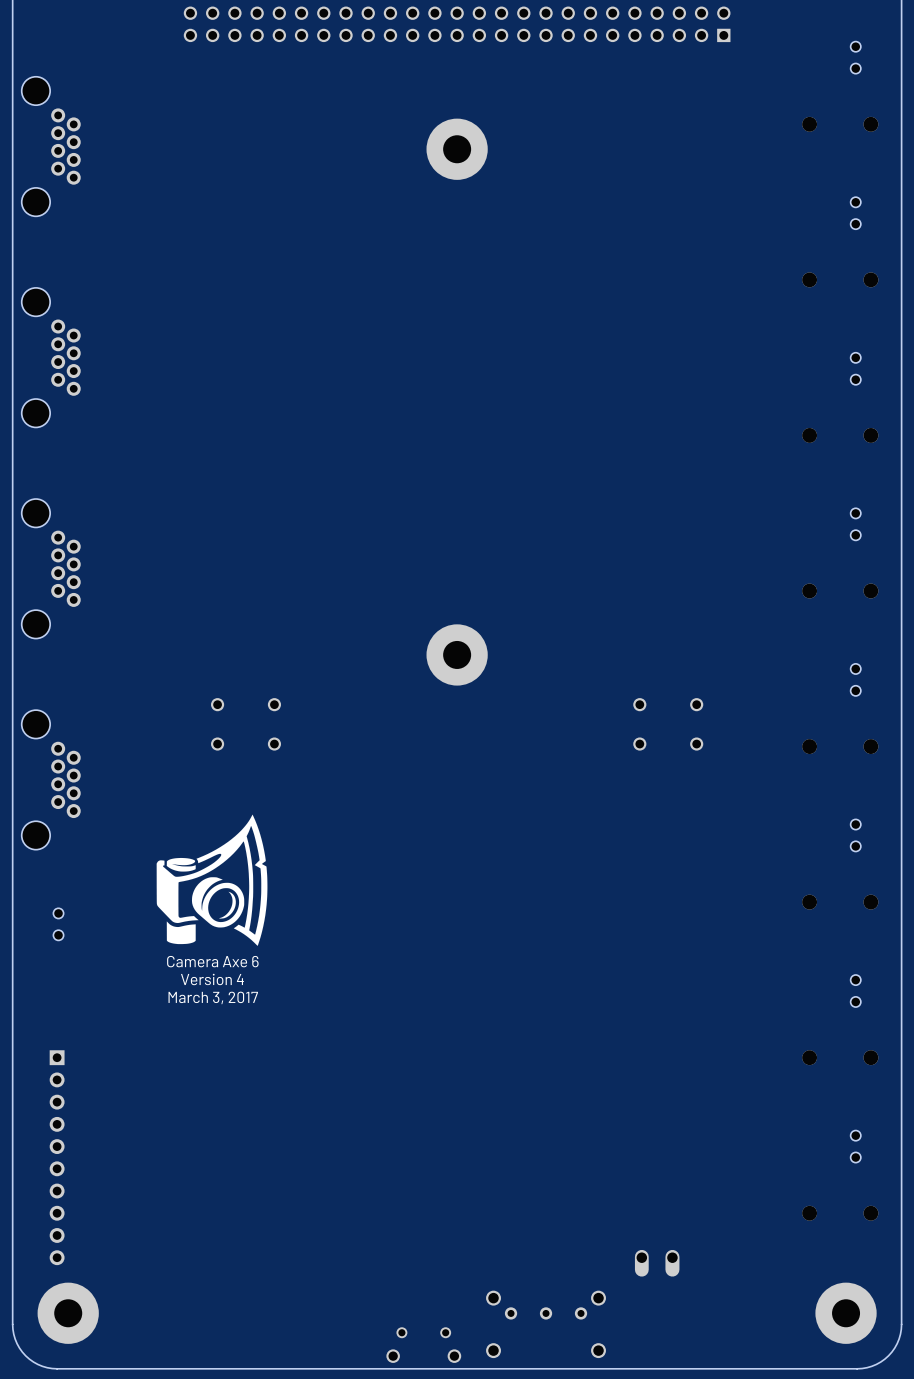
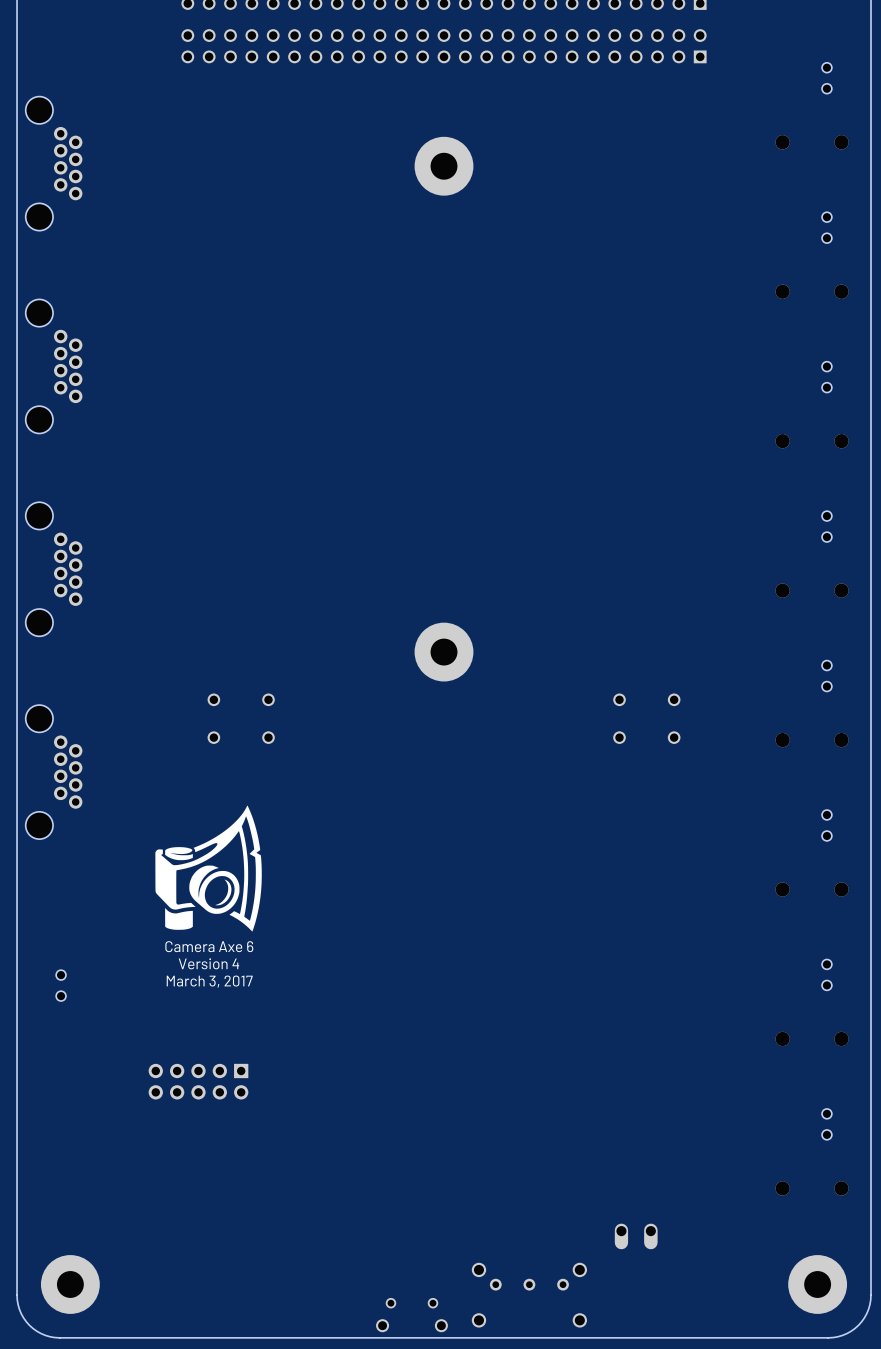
part position: (58, 924) -> (61, 985)
part: none -> (198, 1081)
part: (57, 1157) -> none

